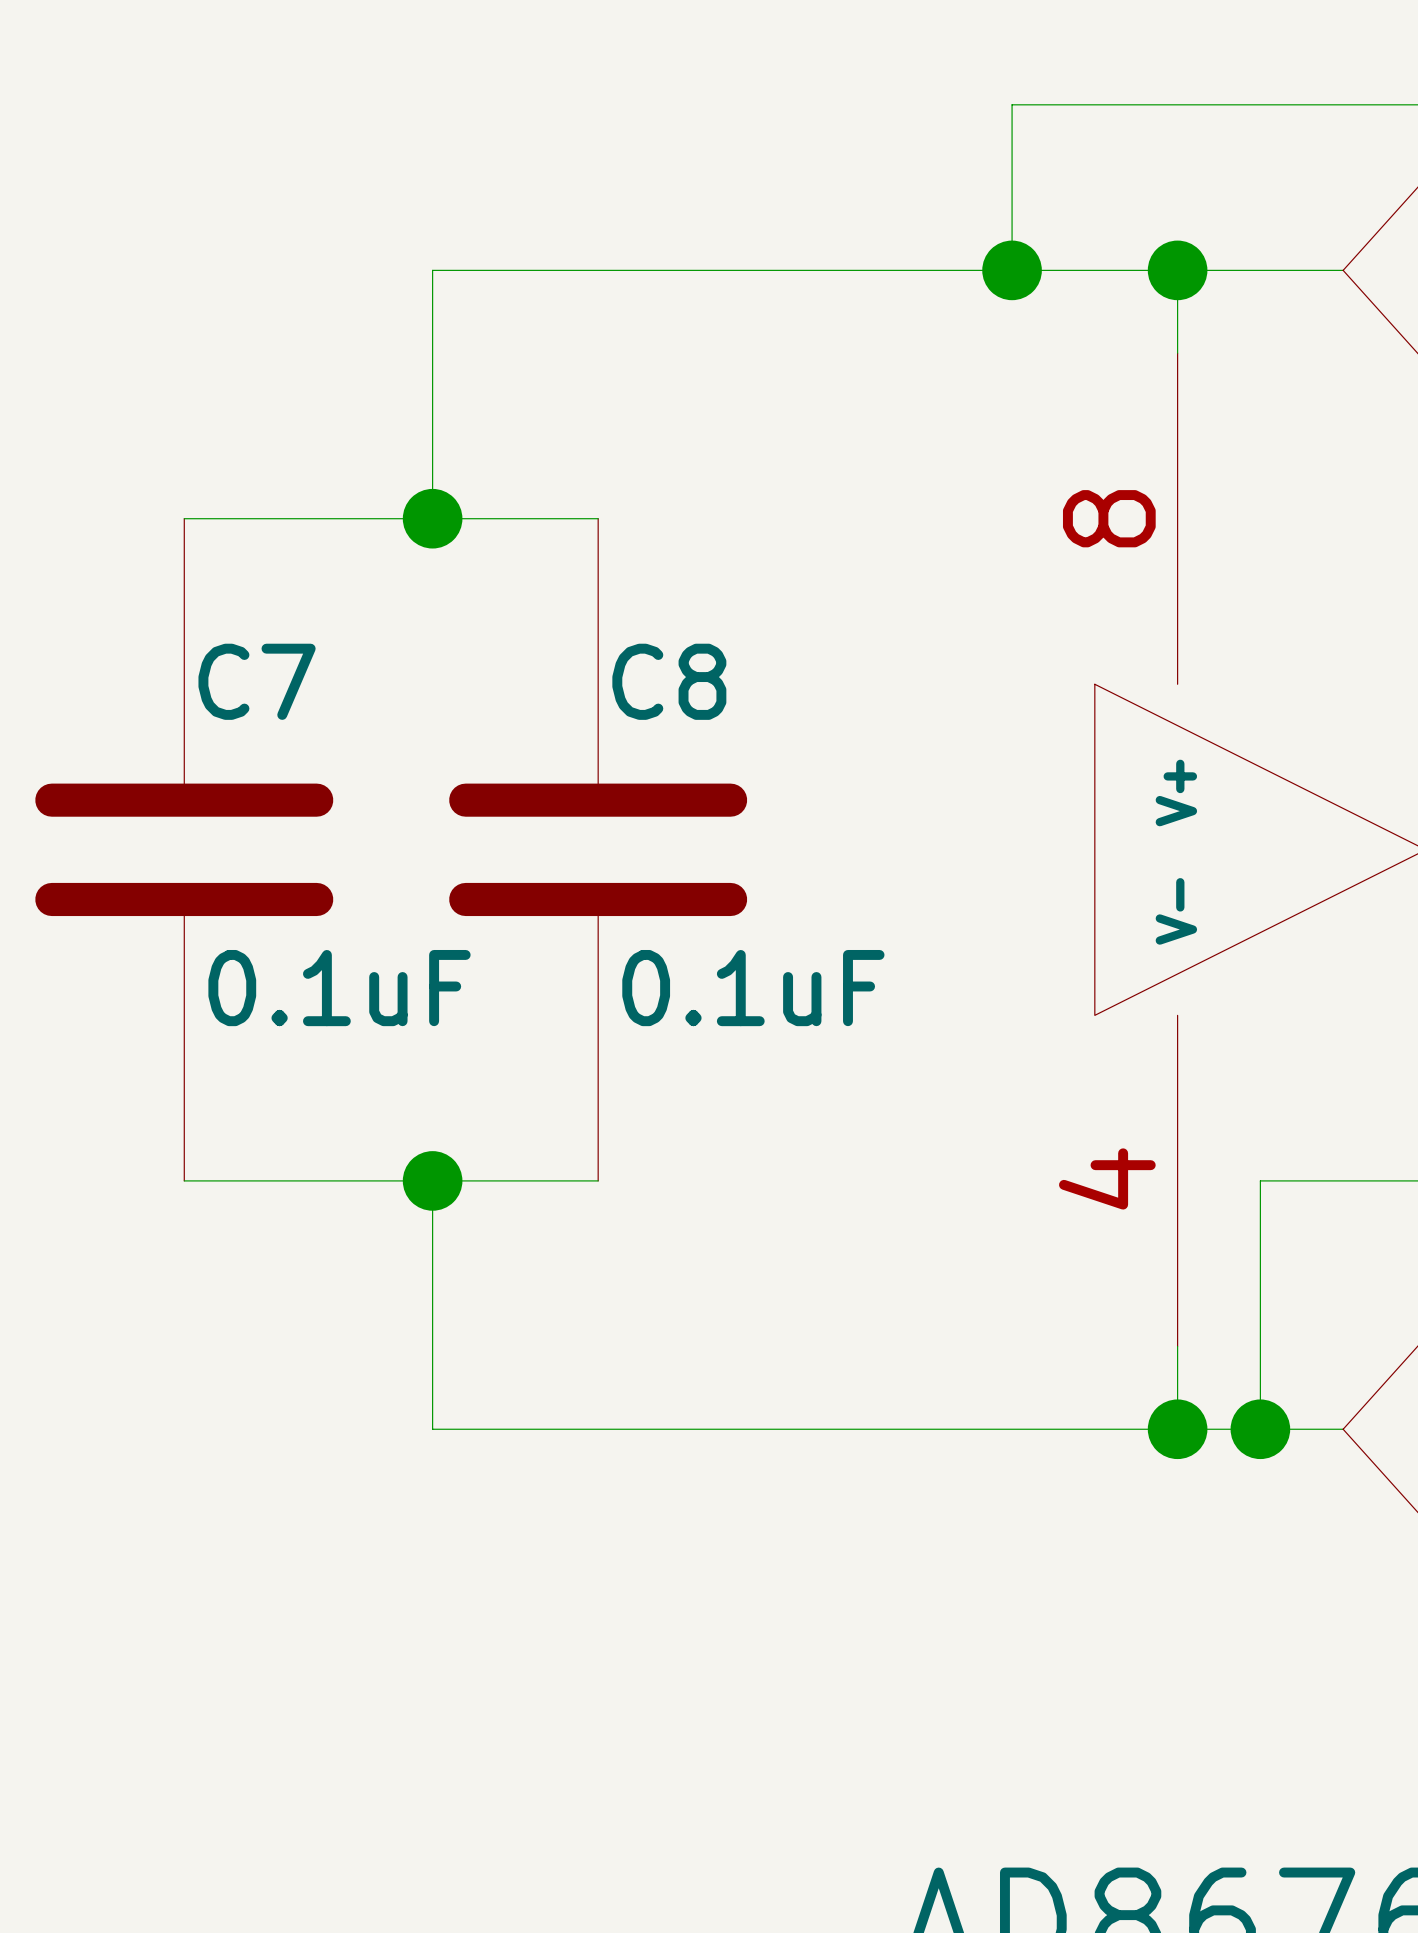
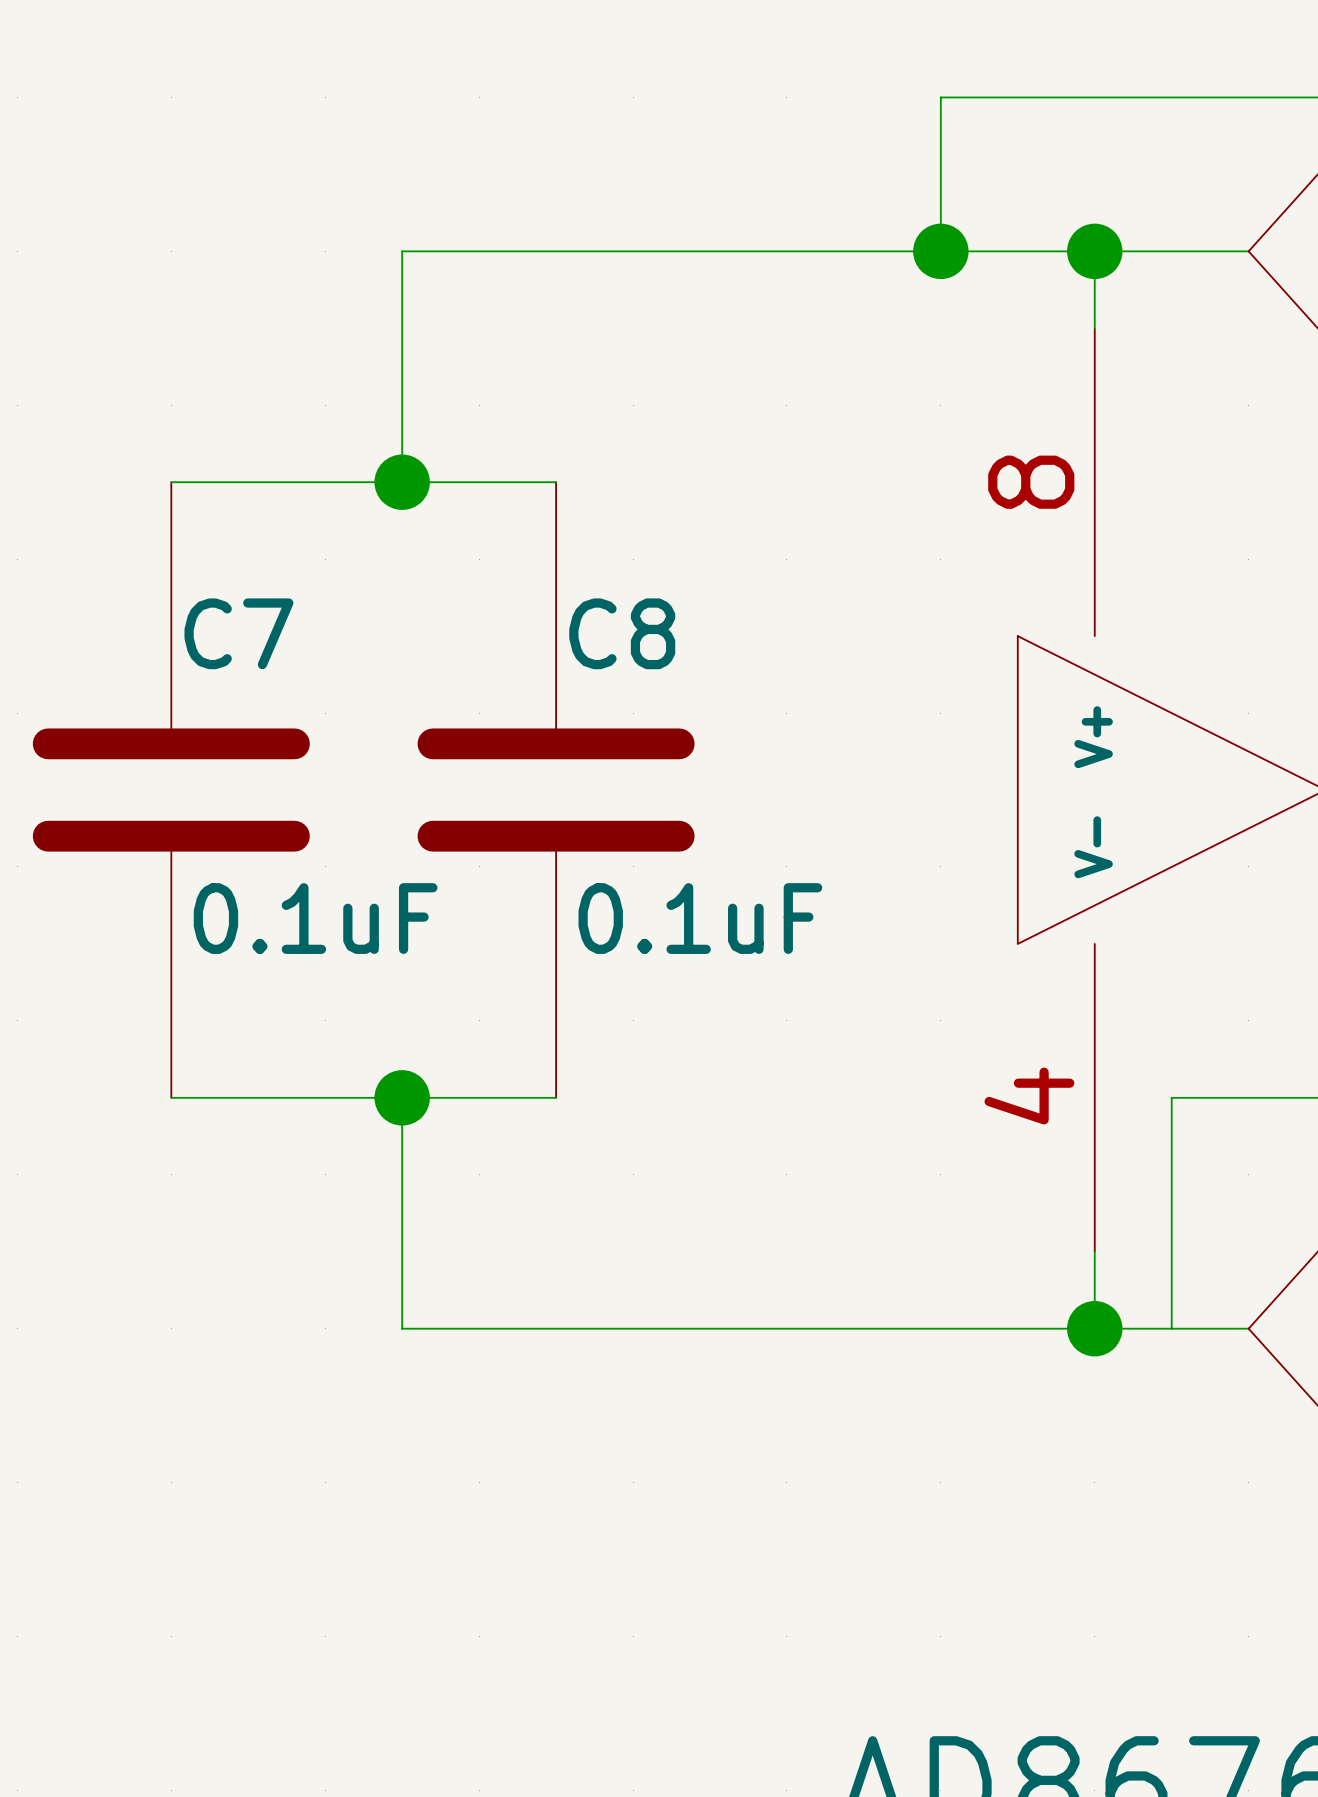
junction: (1260, 1429) -> none

